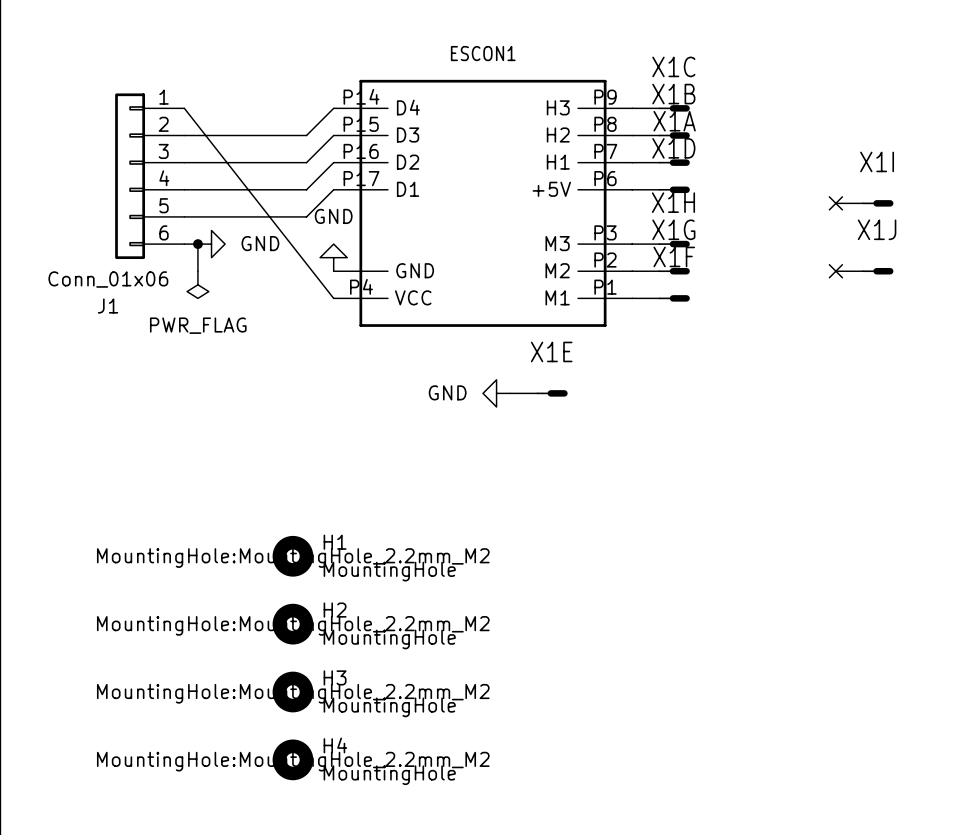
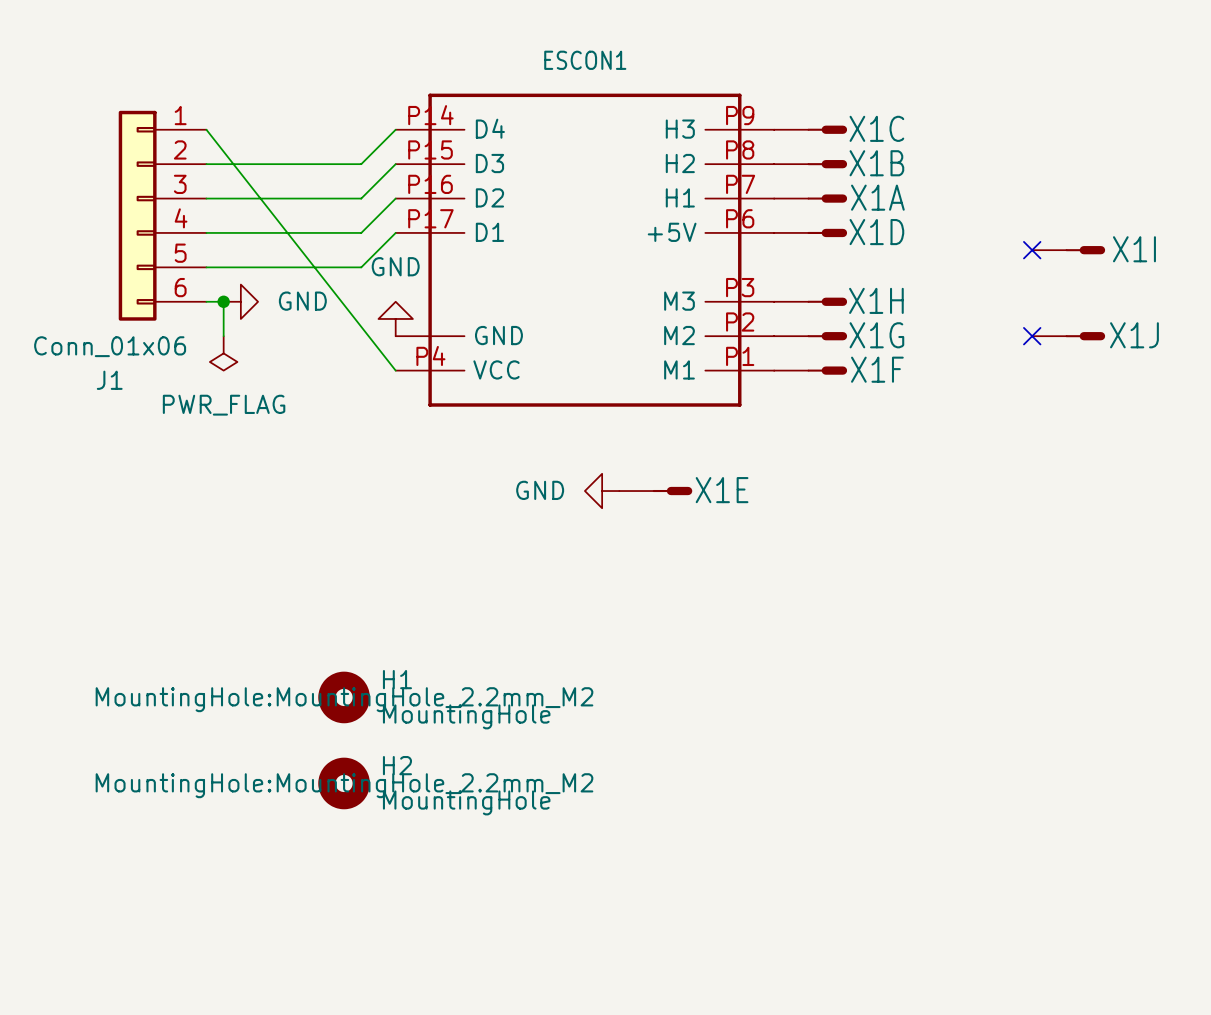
X1C name position: X1C (673, 66) -> X1C (876, 128)
X1B name position: X1B (673, 94) -> X1B (876, 163)
X1A name position: X1A (674, 121) -> X1A (877, 197)
X1D name position: X1D (673, 148) -> X1D (876, 232)
X1I name position: X1I (877, 161) -> X1I (1134, 249)
X1H name position: X1H (673, 202) -> X1H (876, 300)
X1G name position: X1G (673, 229) -> X1G (876, 335)
X1J name position: X1J (877, 229) -> X1J (1134, 335)
X1F name position: X1F (674, 256) -> X1F (877, 369)
X1E name position: X1E (551, 351) -> X1E (722, 490)
H3: MountingHole (292, 692) -> none
H4: MountingHole (292, 759) -> none

